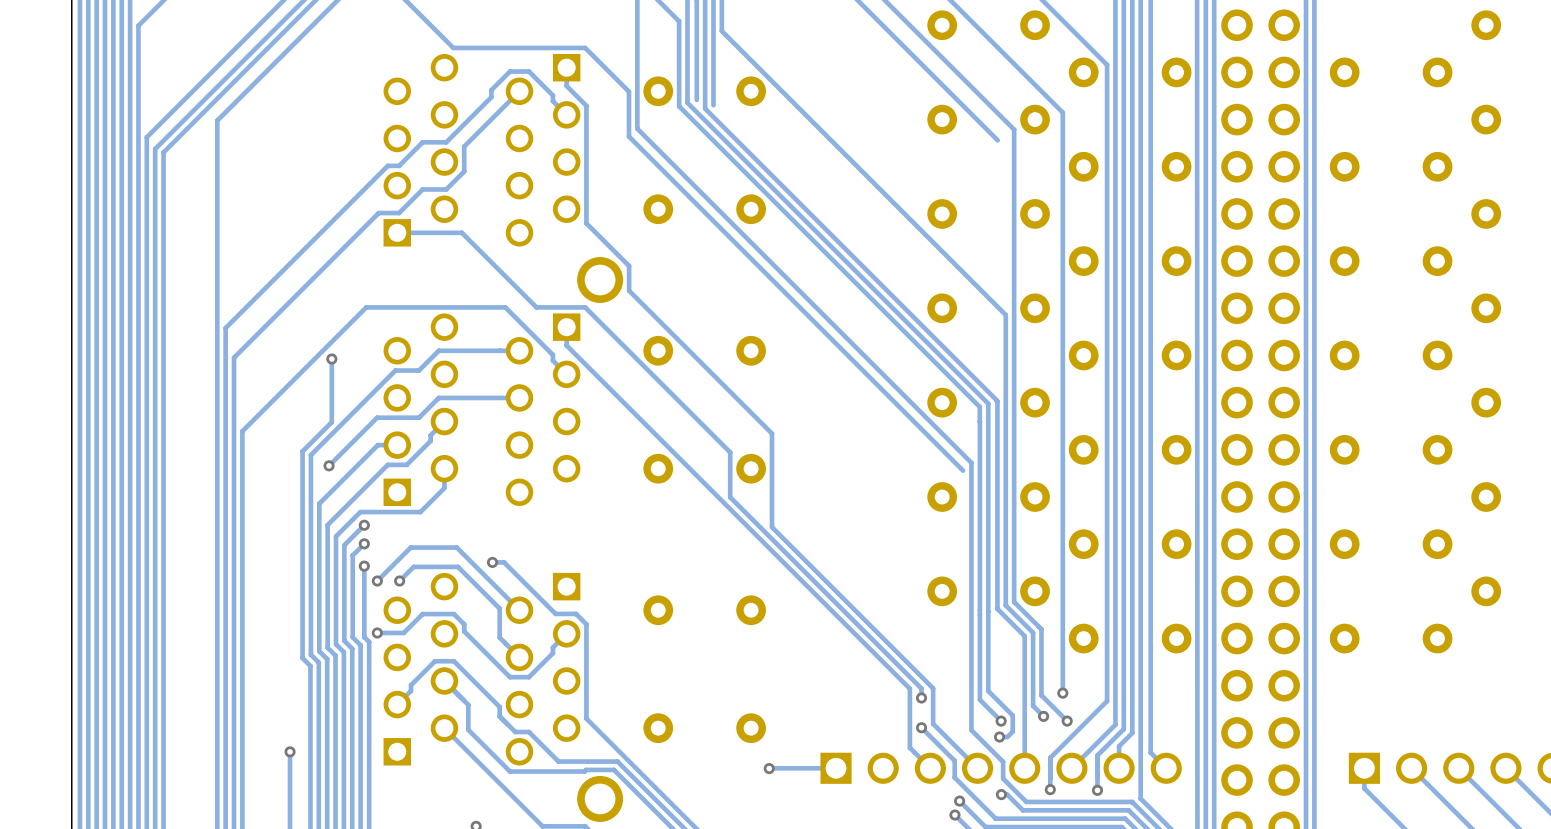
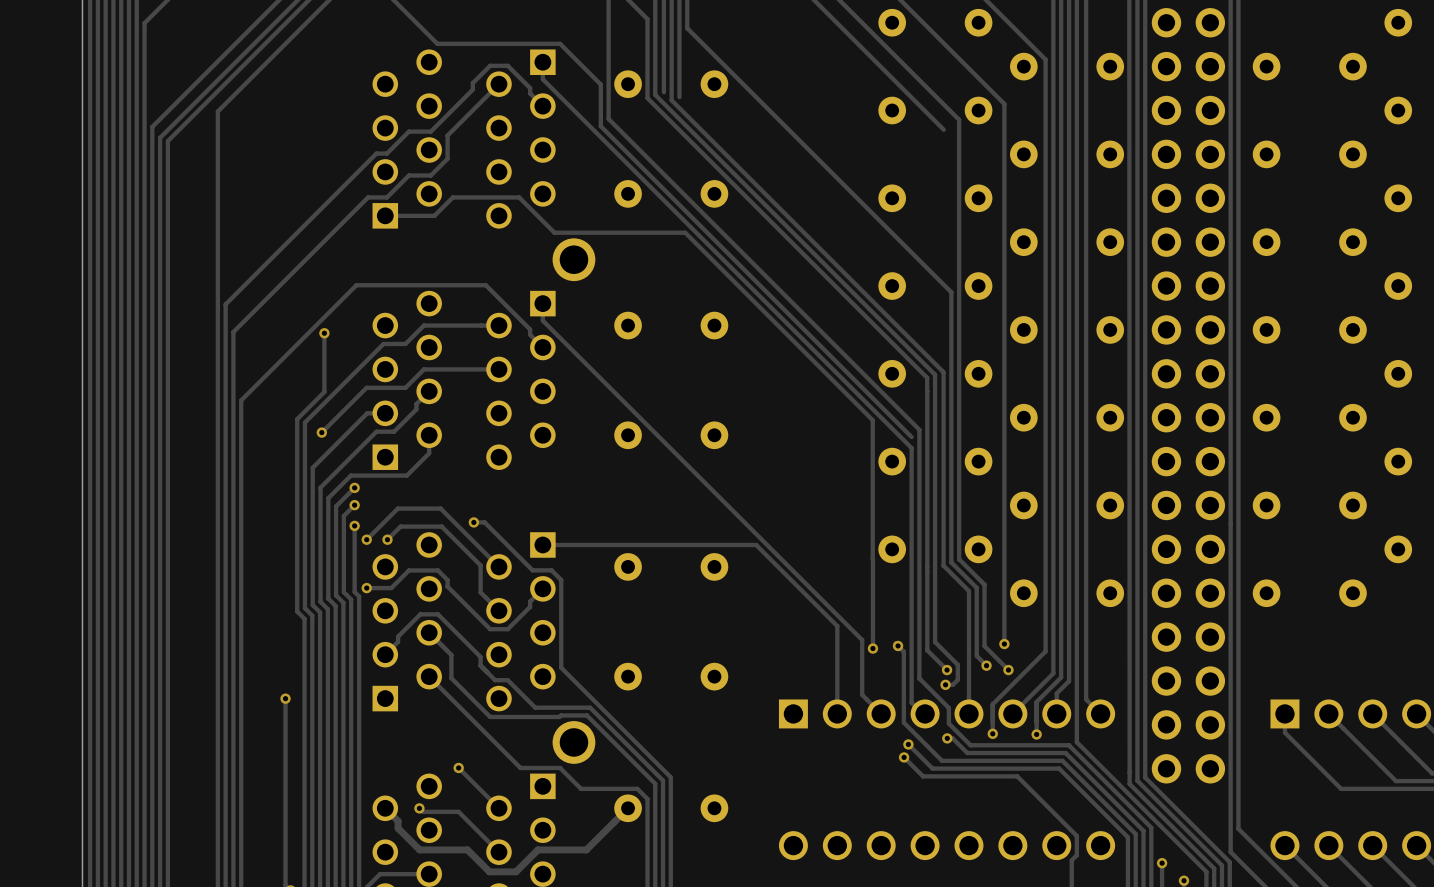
track: (586, 105) (586, 223) (629, 266) (629, 290) (772, 433) (772, 527) (933, 688) (933, 723) (977, 768) -> (561, 97) (911, 448) (911, 702) (925, 713)
track: (450, 232) (461, 232) (536, 307) (585, 307) (730, 452) (730, 497) (921, 688) -> (434, 215) (452, 197) (519, 197) (554, 232) (685, 232) (872, 420) (872, 558)
track: none -> (542, 544) (756, 544) (837, 626) (837, 713)
track: none -> (872, 558) (872, 639)
track: (921, 727) (954, 760) -> (895, 643) (903, 651) (903, 707)
via position: (921, 727) -> (898, 645)
via: (769, 768) -> none
track: (836, 768) (769, 768) -> none

